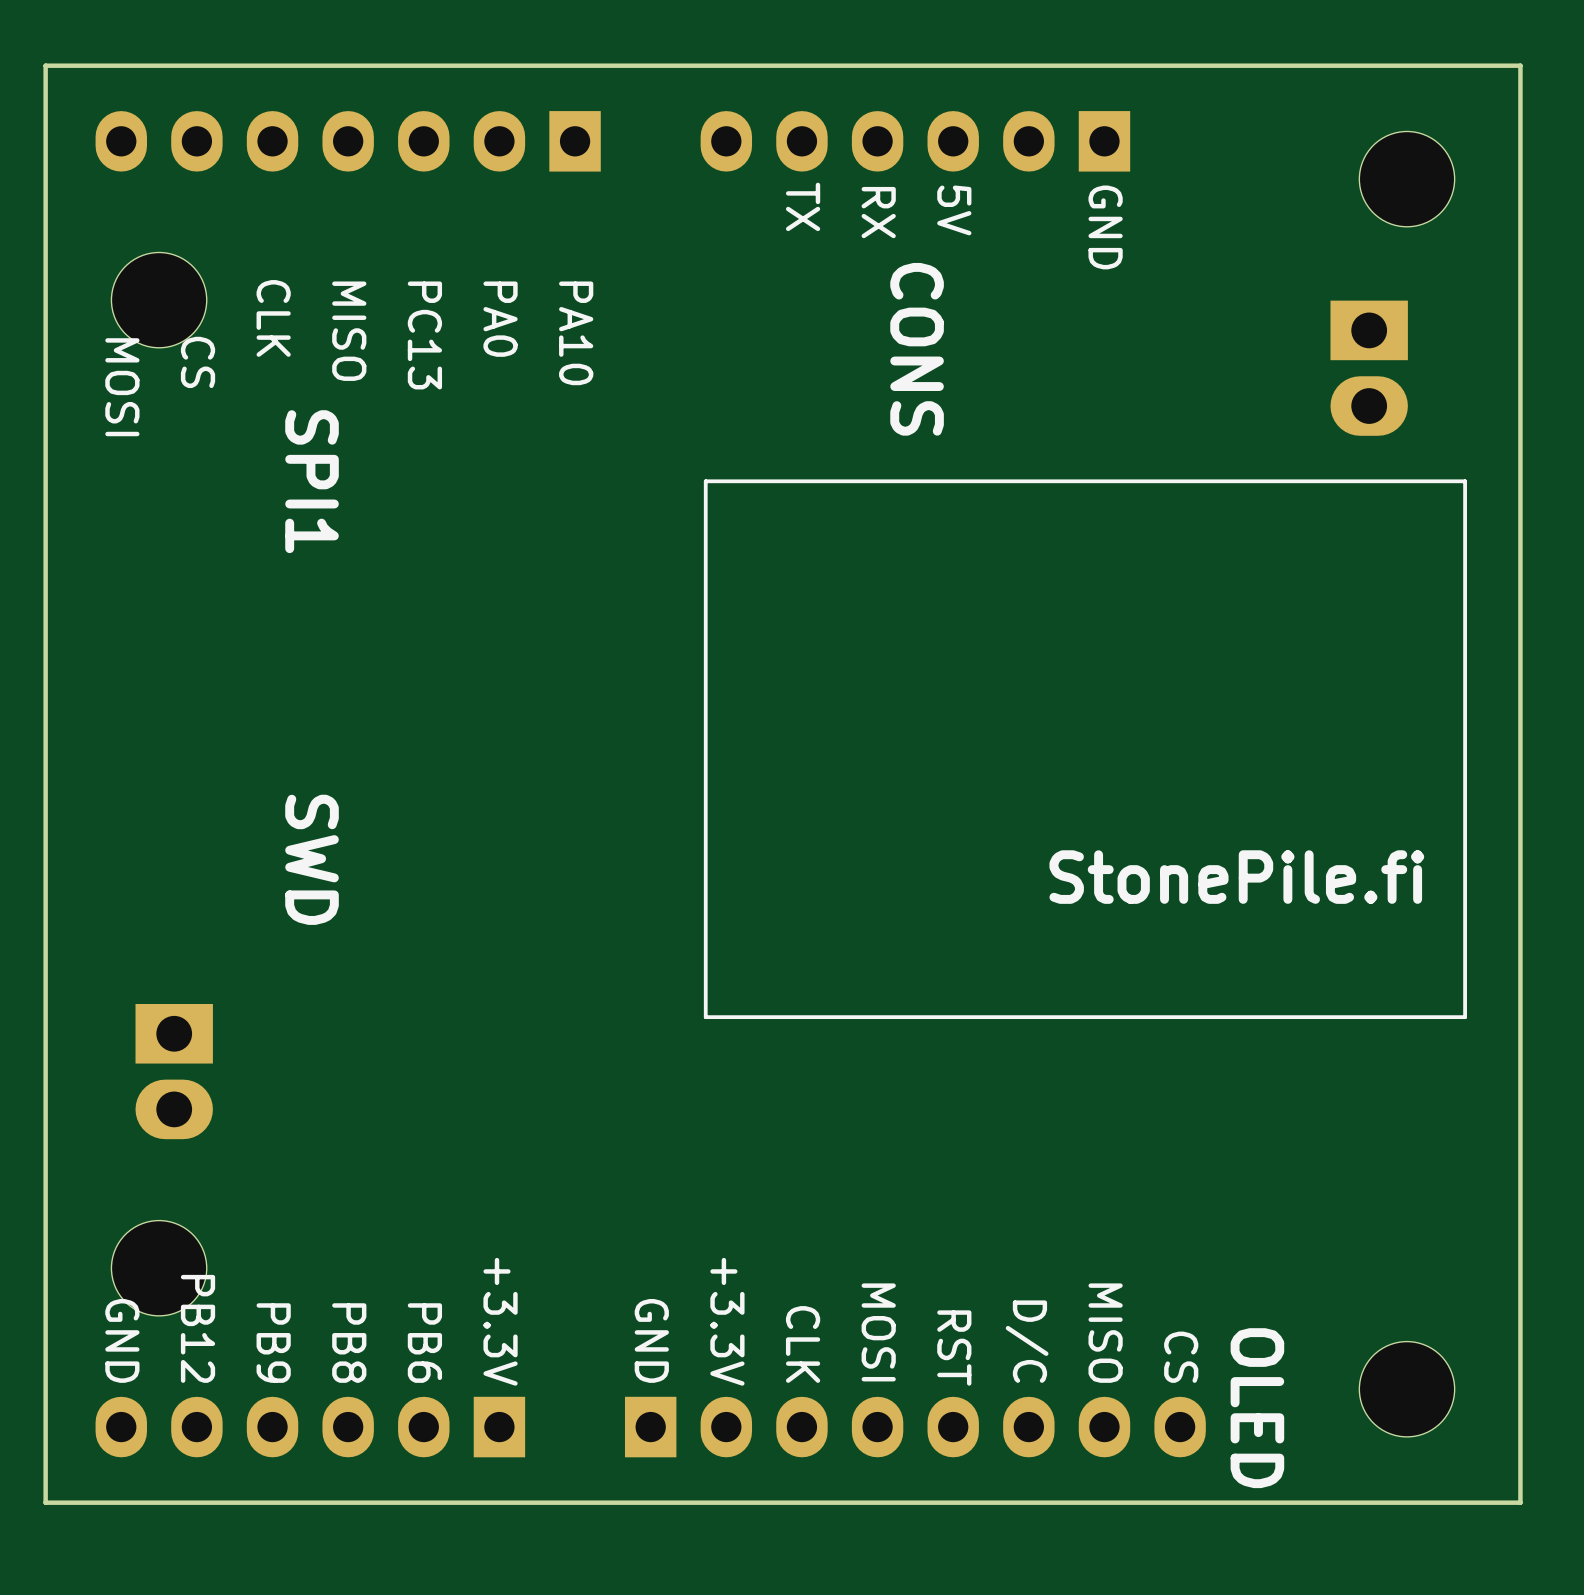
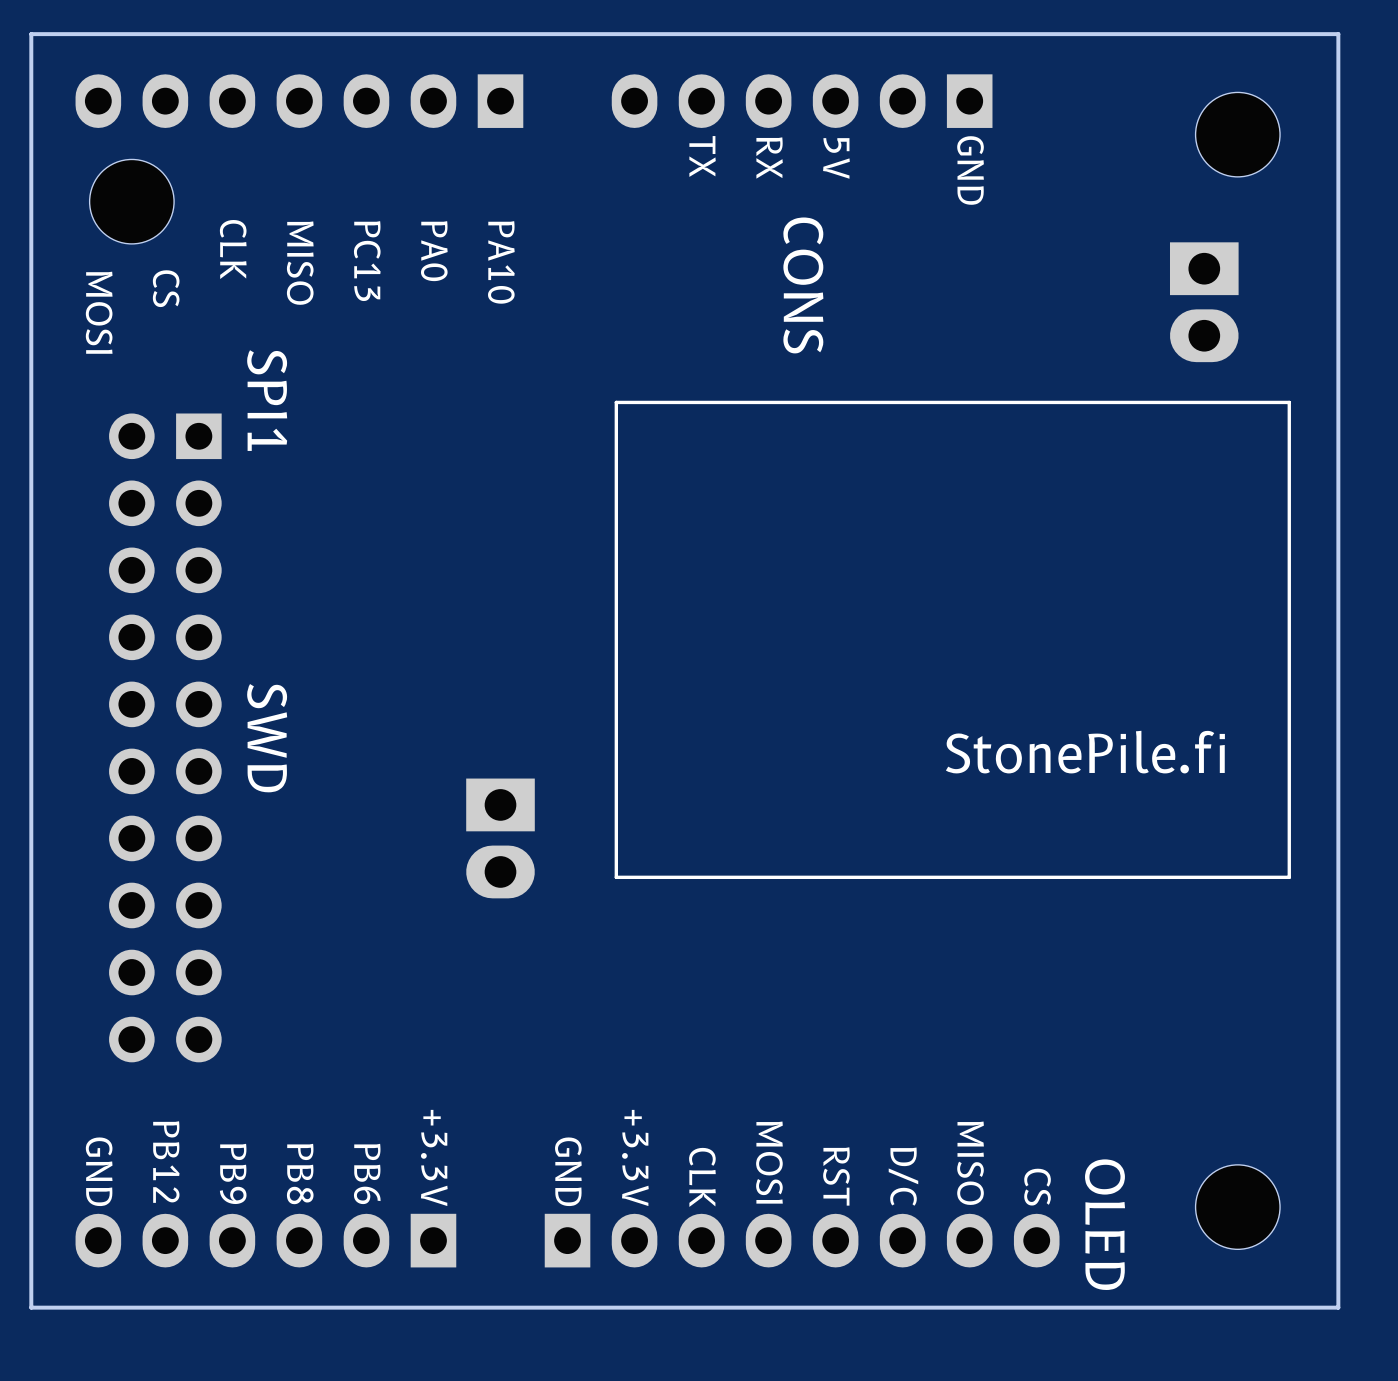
part position: (159, 300) -> (131, 201)
part: none -> (165, 737)
part position: (174, 1071) -> (500, 838)
part: (159, 1268) -> none

